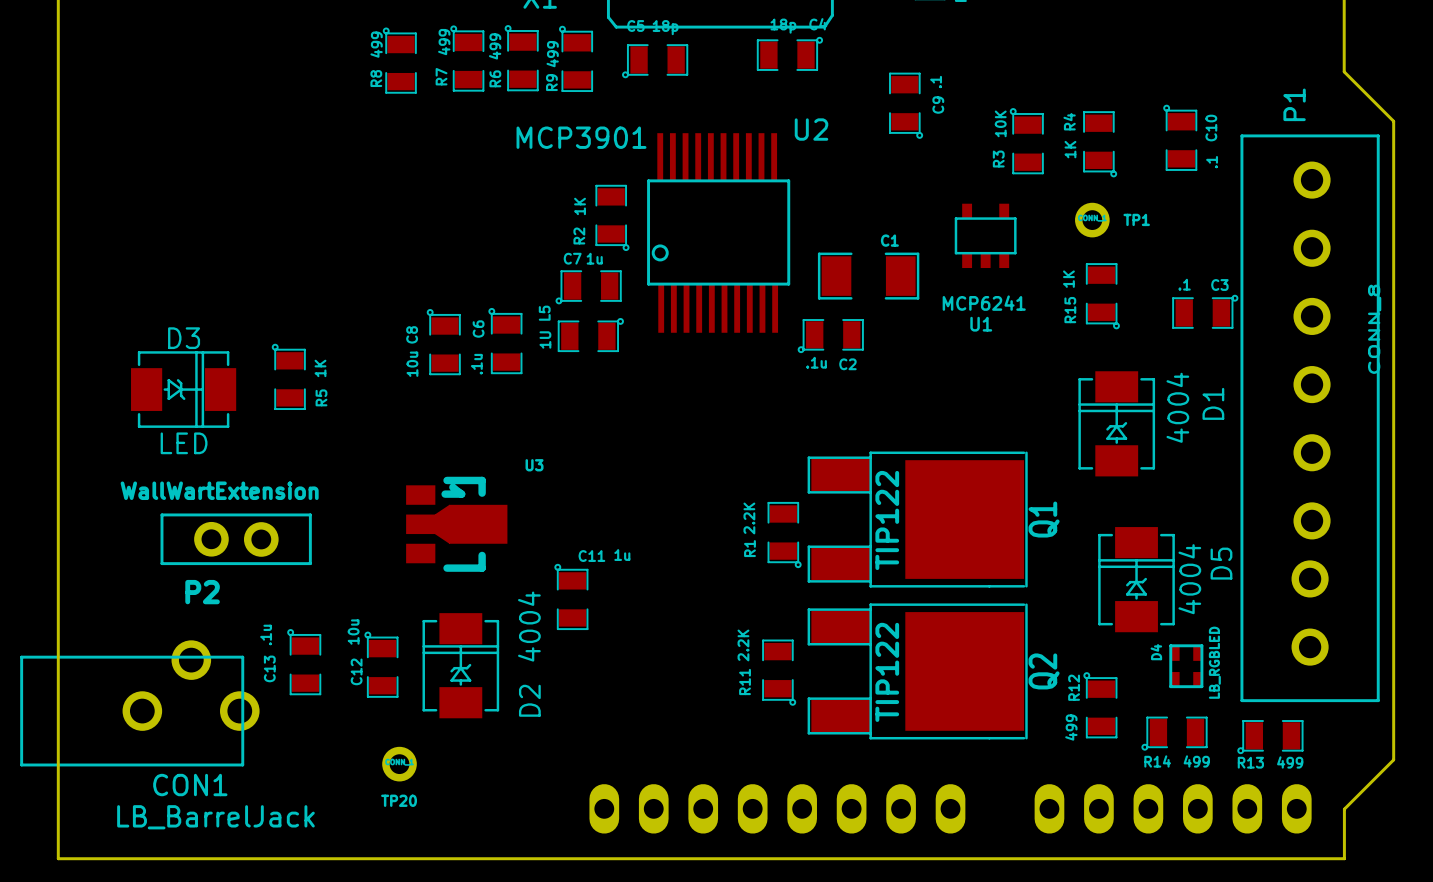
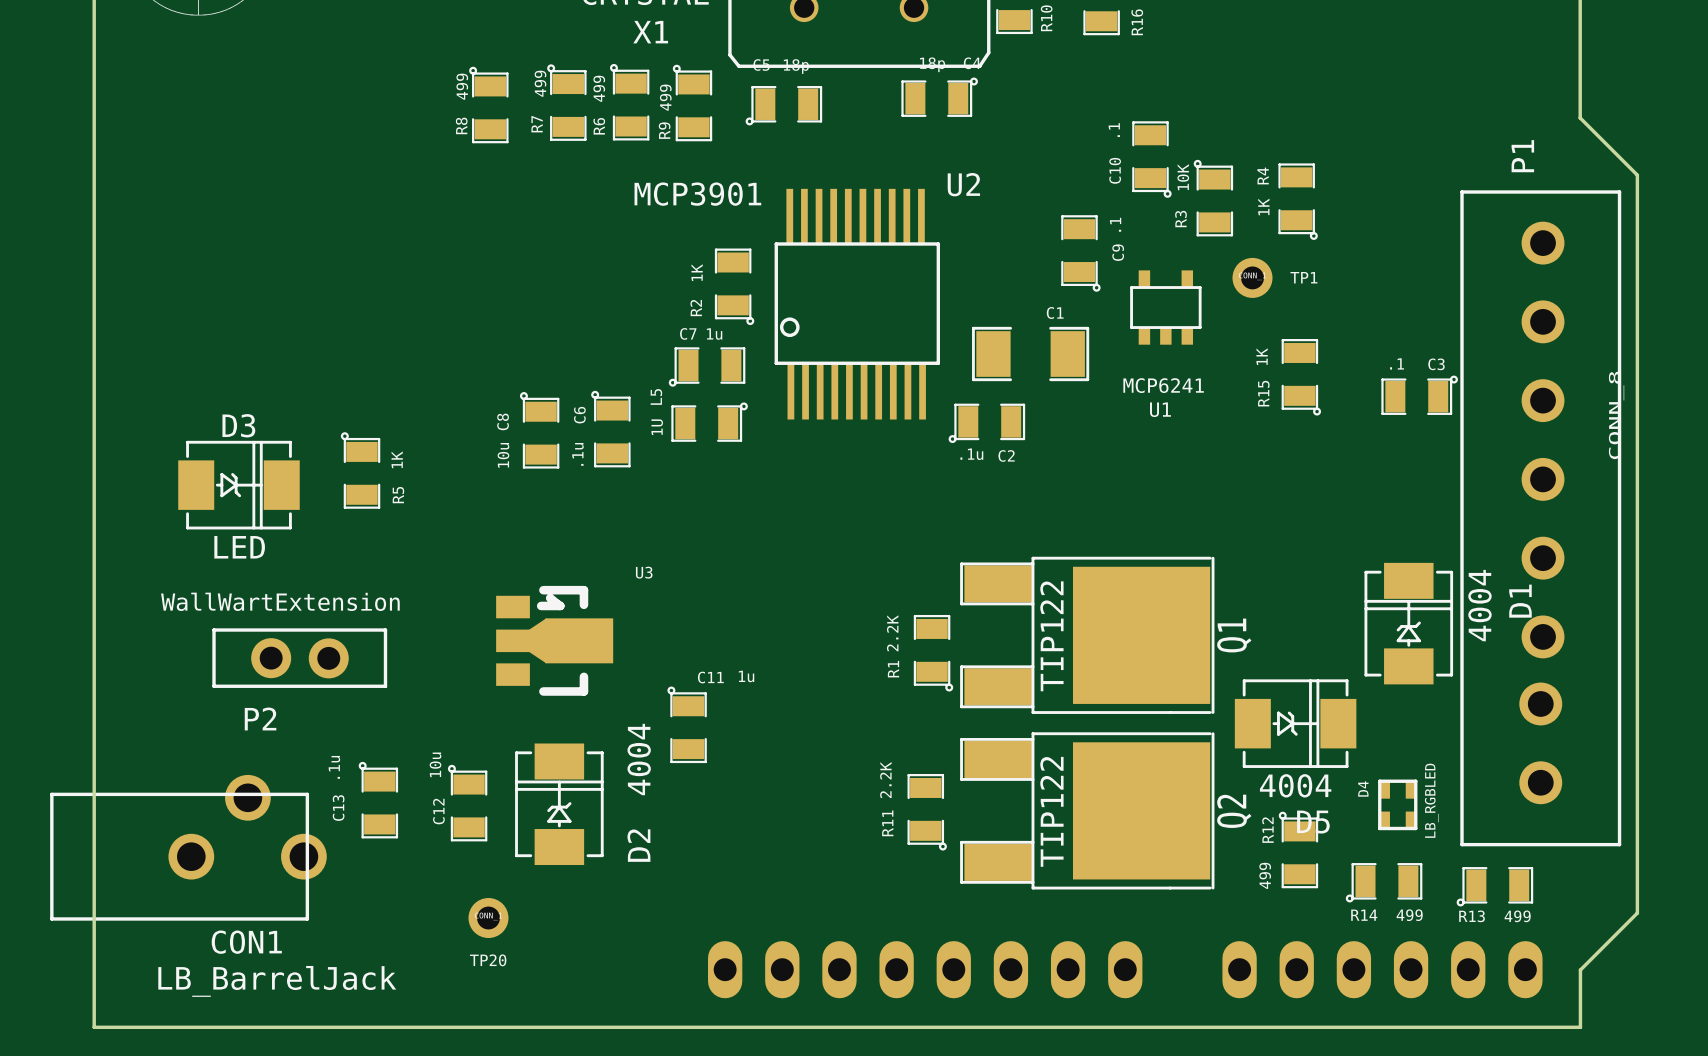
C9 position: (906, 105) -> (1080, 253)
C10 rotation: 0° (1180, 137) -> 180° (1151, 159)
C10 position: (1180, 137) -> (1151, 159)
TP1 position: (1092, 220) -> (1252, 277)
D1 position: (1116, 423) -> (1408, 623)
D5 rotation: 0° (1136, 579) -> 90° clockwise (1295, 723)

